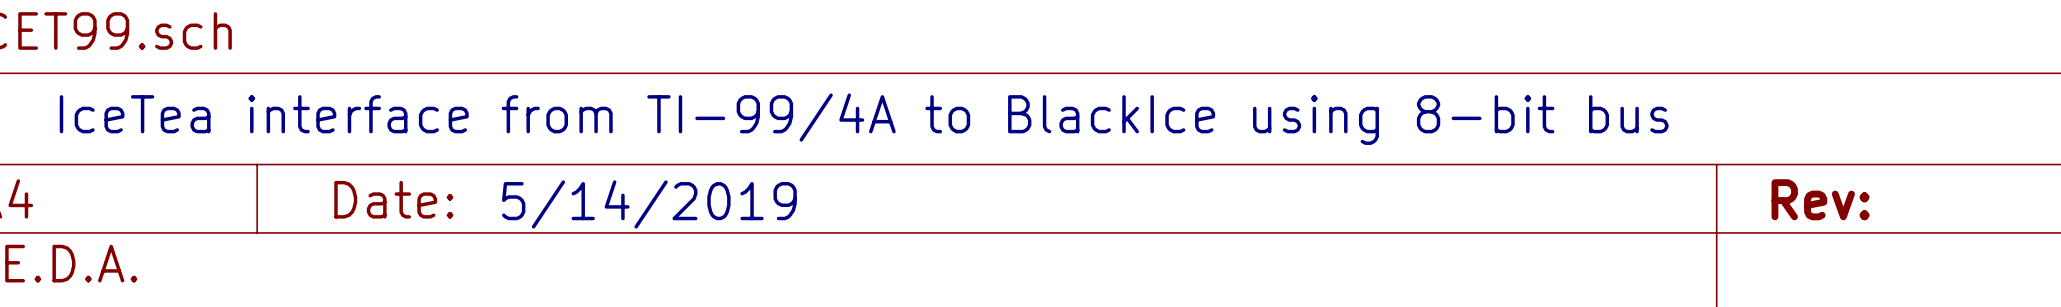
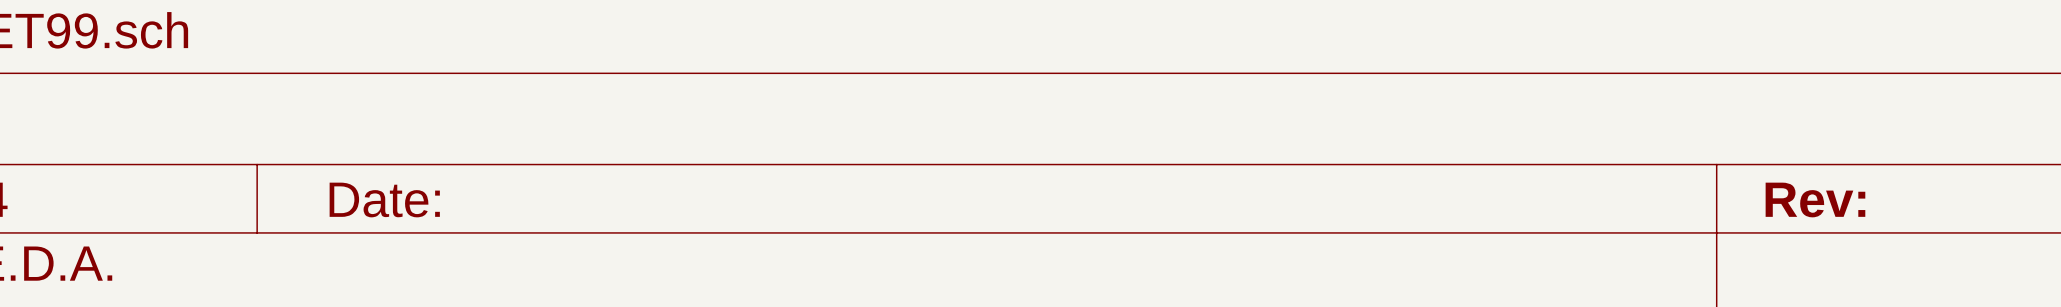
text: IceTea interface from TI-99/4A to BlackIce using 8-bit bus (864, 119) -> none
text: 5/14/2019 (649, 204) -> none

